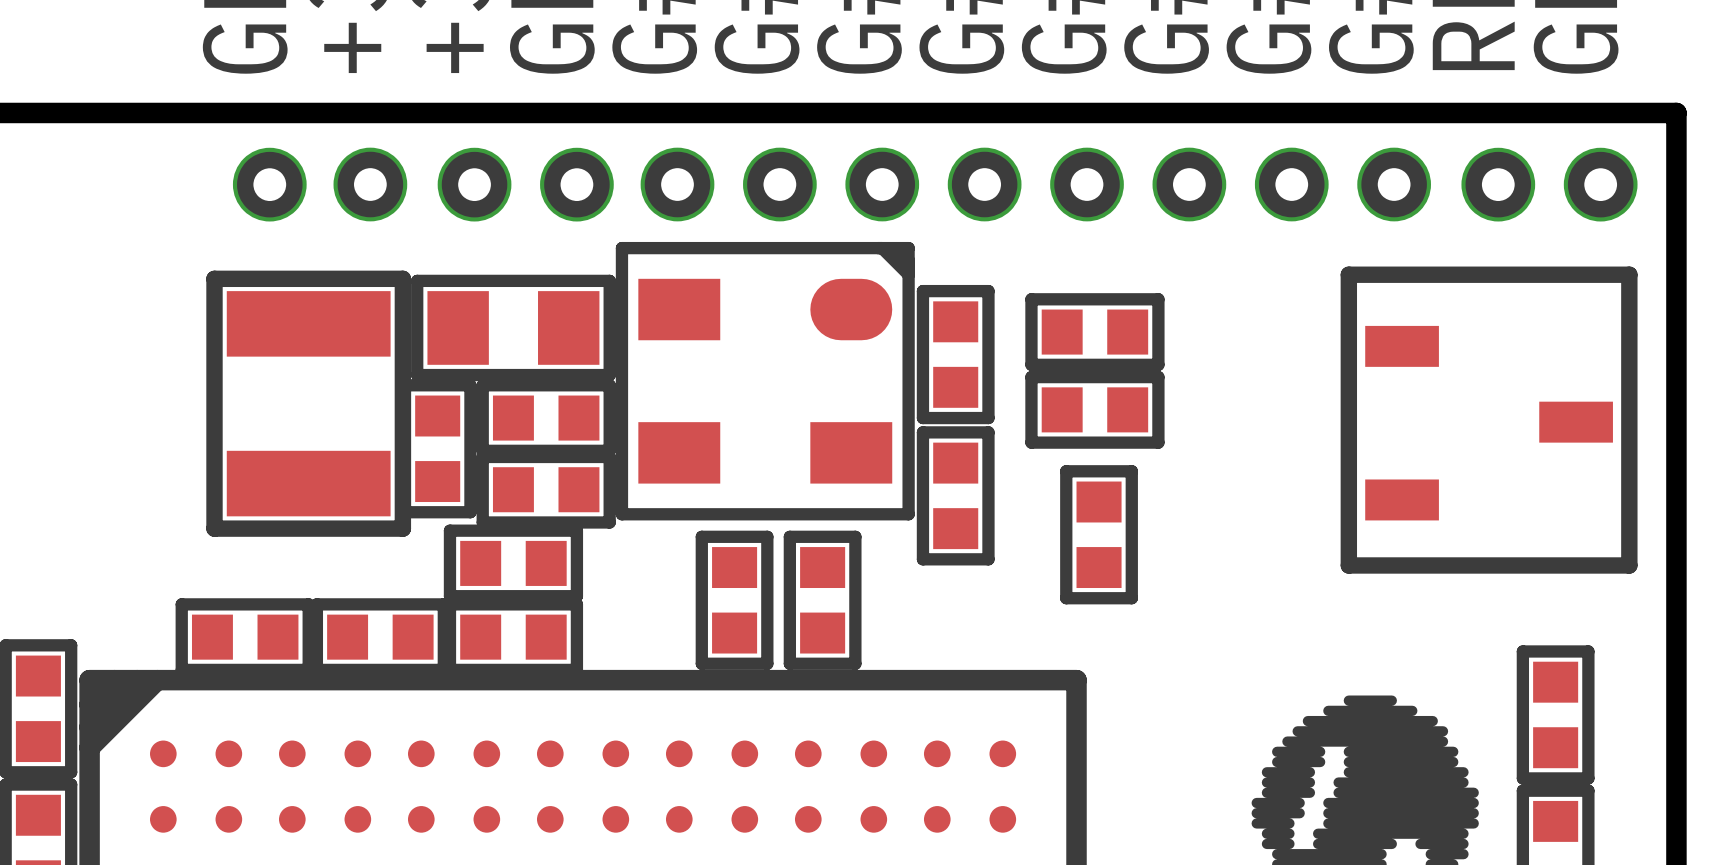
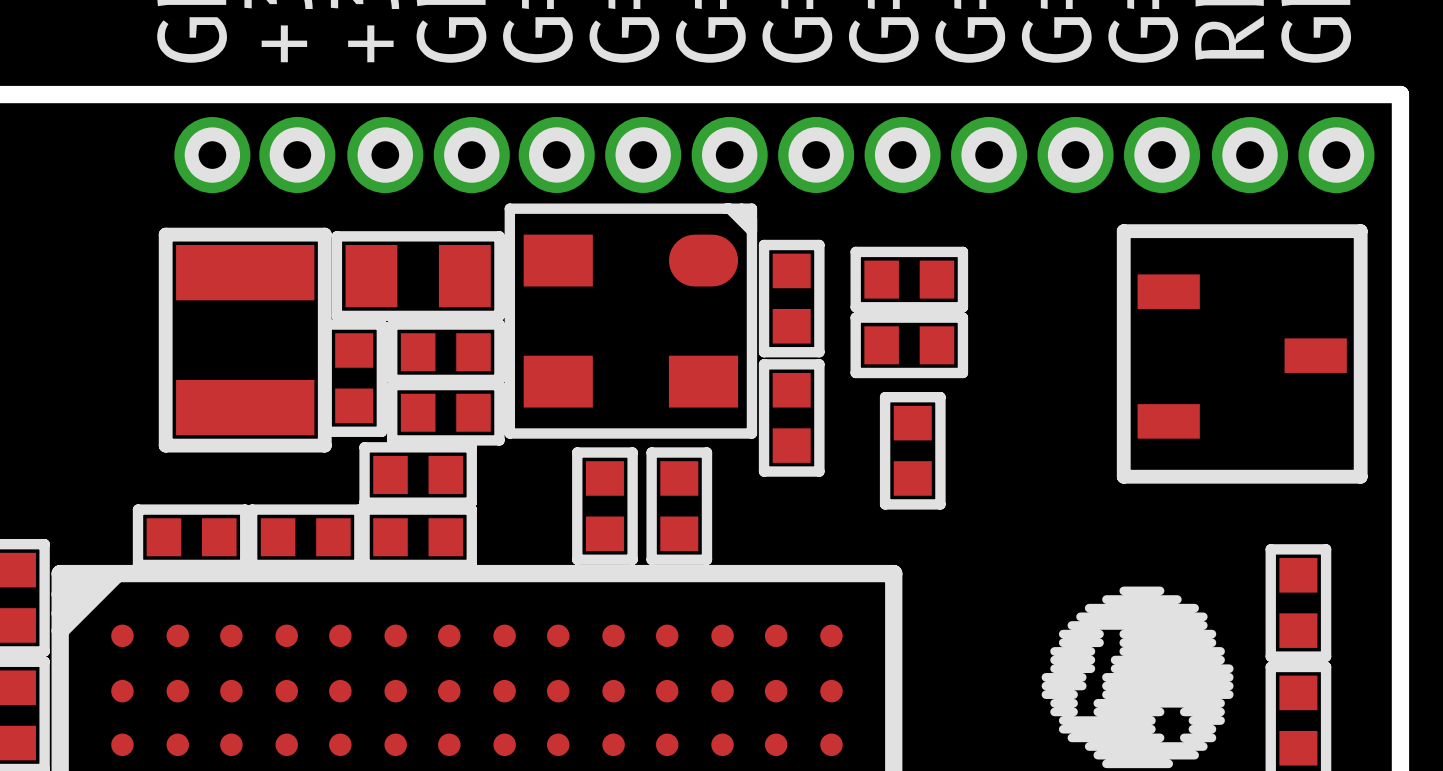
part footprint: [232, 147, 307, 222] -> [174, 117, 251, 194]
part footprint: [333, 147, 408, 222] -> [259, 116, 336, 194]
part footprint: [437, 147, 512, 222] -> [347, 117, 424, 194]
part footprint: [540, 147, 614, 222] -> [433, 117, 510, 194]
part footprint: [640, 147, 715, 222] -> [518, 116, 595, 194]
part footprint: [743, 147, 817, 222] -> [605, 116, 682, 194]
part footprint: [845, 147, 920, 222] -> [691, 116, 768, 194]
part footprint: [947, 147, 1022, 222] -> [778, 116, 855, 194]
part footprint: [1050, 147, 1124, 222] -> [864, 116, 941, 194]
part footprint: [1152, 147, 1227, 222] -> [951, 116, 1028, 194]
part footprint: [1254, 147, 1329, 222] -> [1037, 116, 1114, 194]
part footprint: [1357, 147, 1431, 222] -> [1123, 116, 1201, 194]
part footprint: [1461, 147, 1536, 222] -> [1211, 117, 1289, 194]
part footprint: [1563, 147, 1638, 222] -> [1298, 117, 1375, 194]

